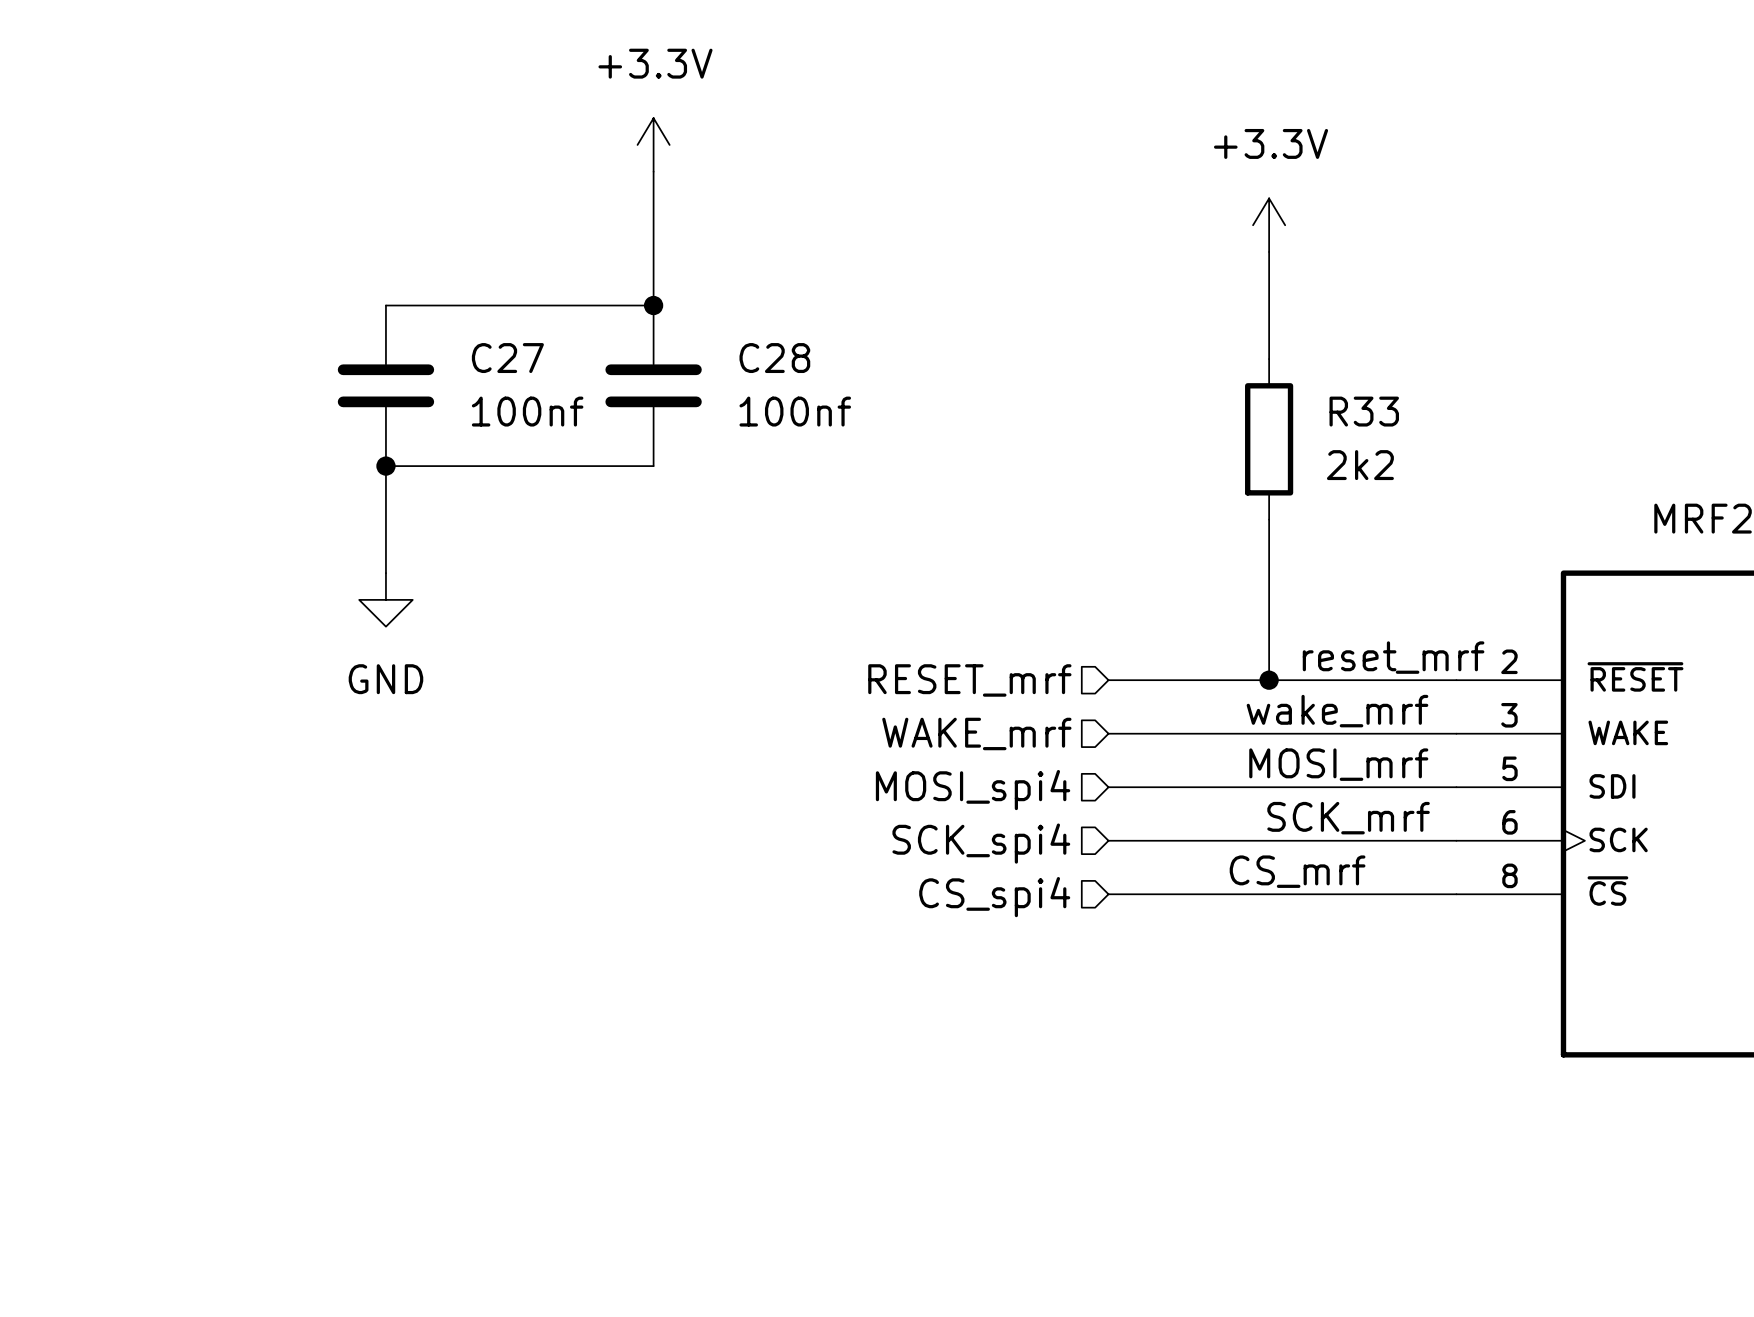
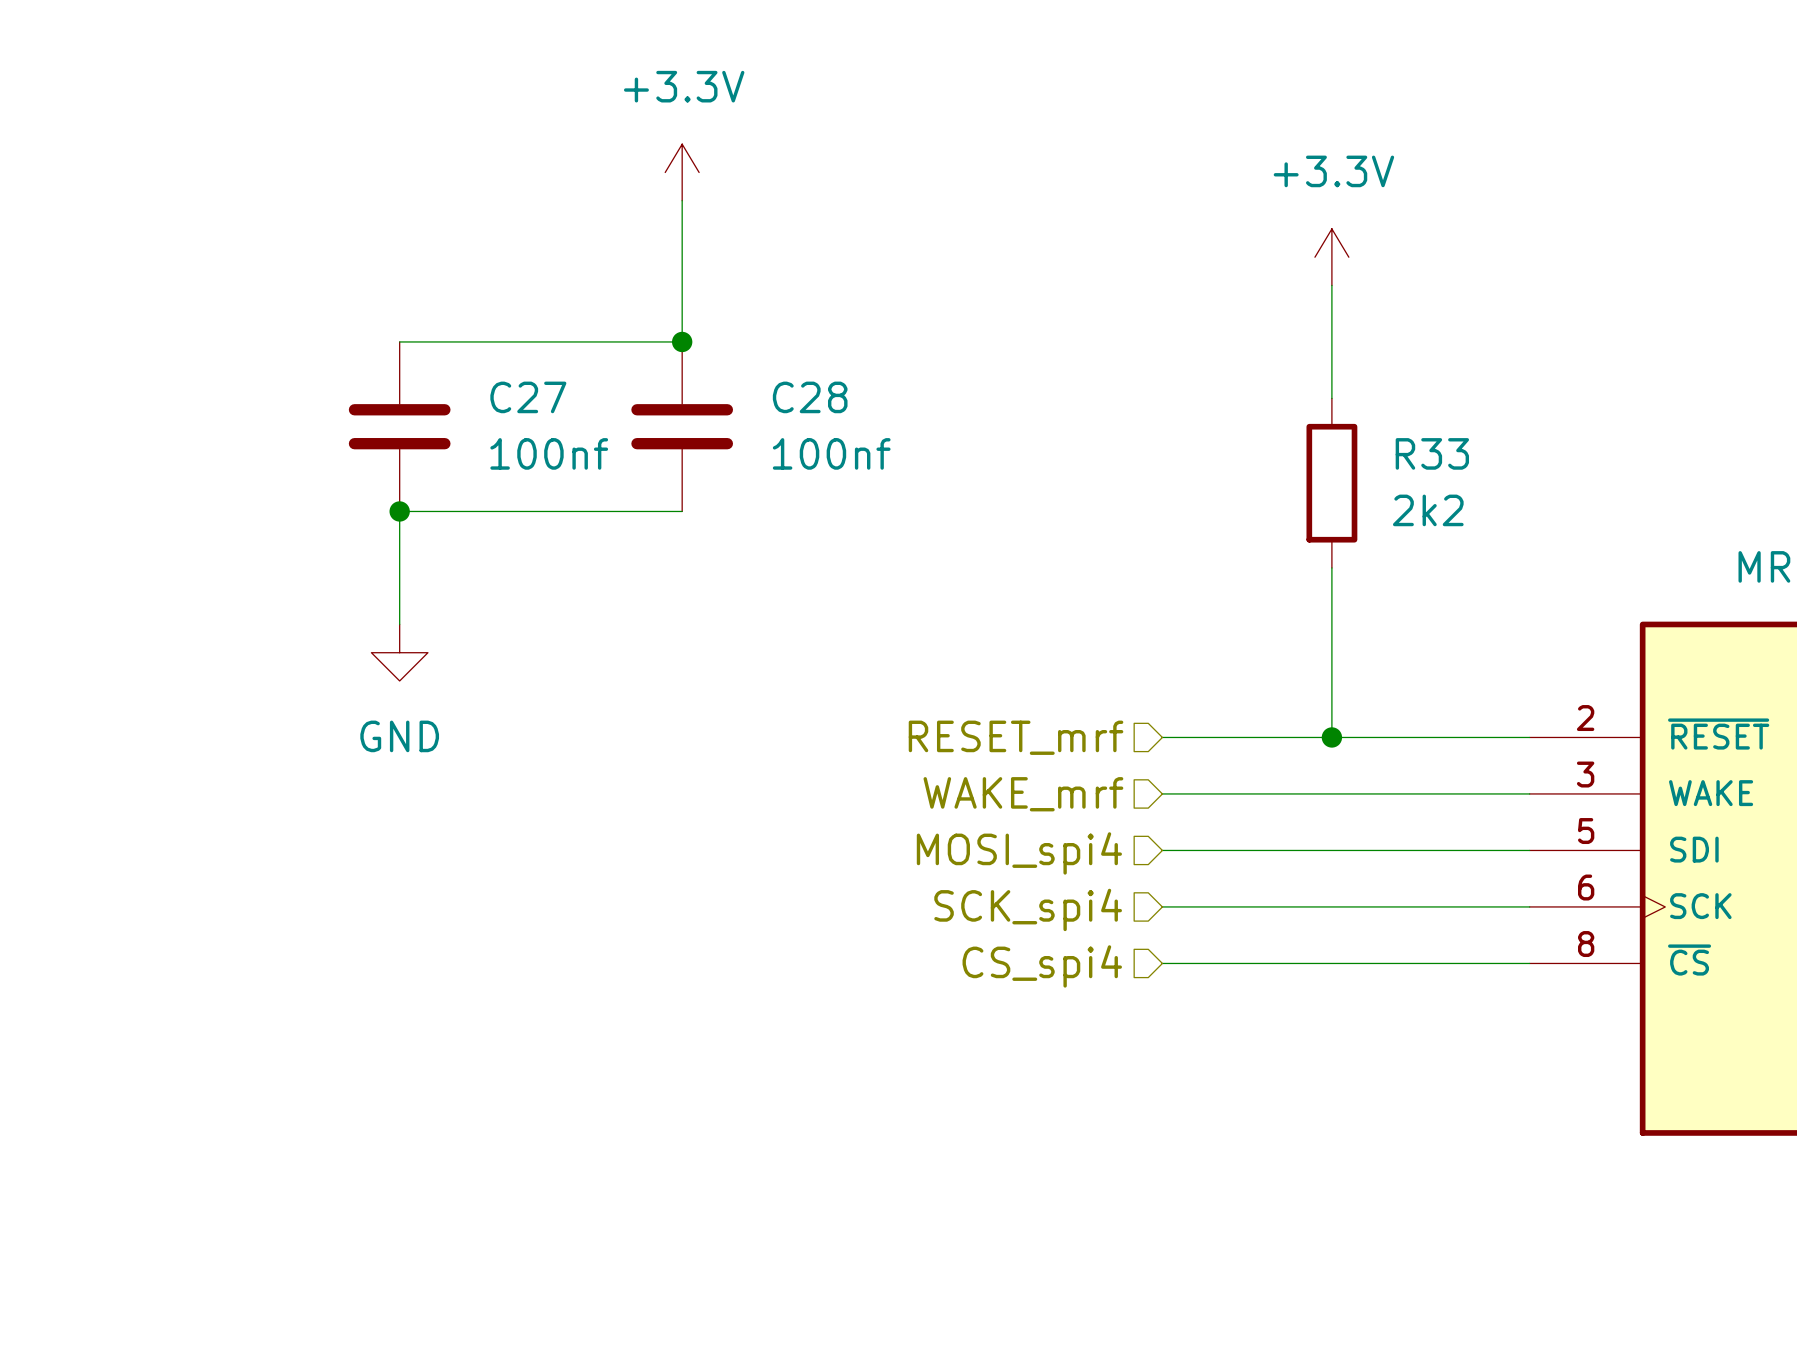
label: reset_mrf (1393, 657) -> none
label: wake_mrf (1337, 711) -> none
label: MOSI_mrf (1338, 764) -> none
label: SCK_mrf (1348, 818) -> none
label: CS_mrf (1297, 871) -> none

